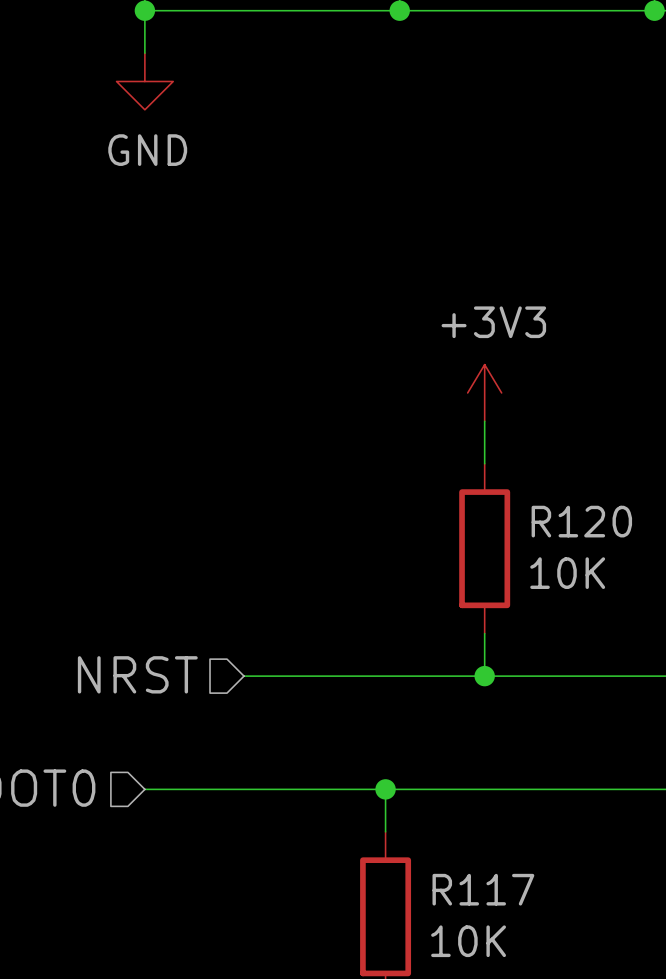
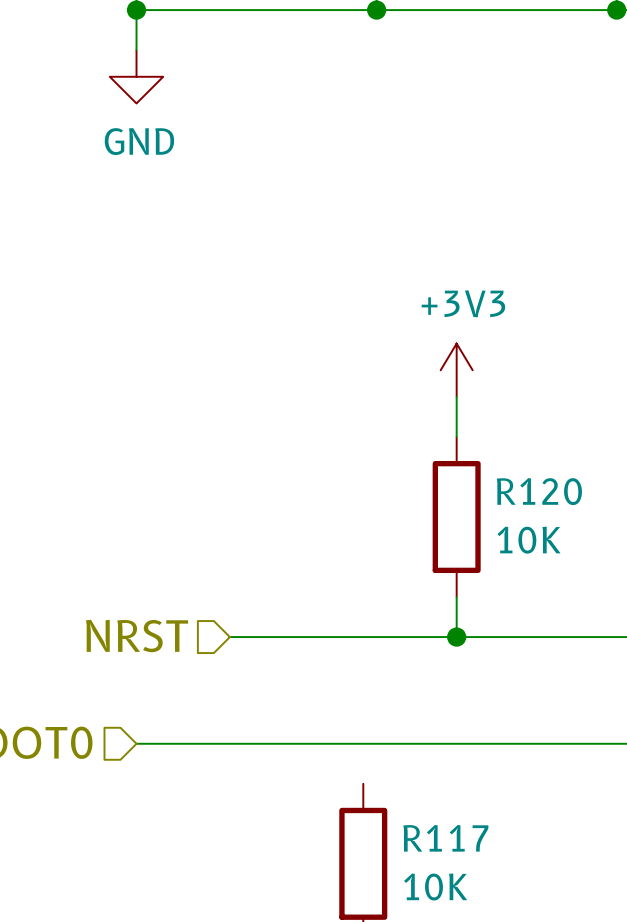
wire: (385, 789) (385, 831) -> none
junction: (385, 789) -> none

